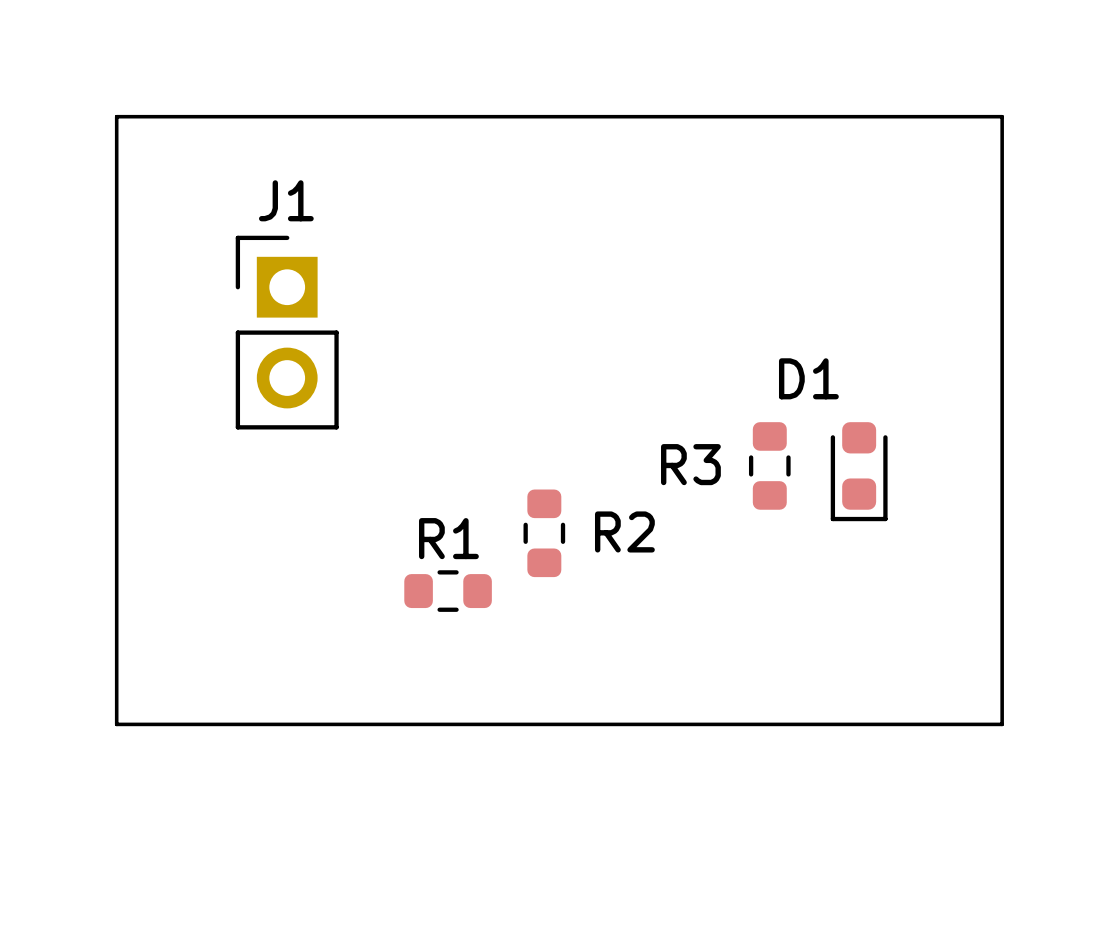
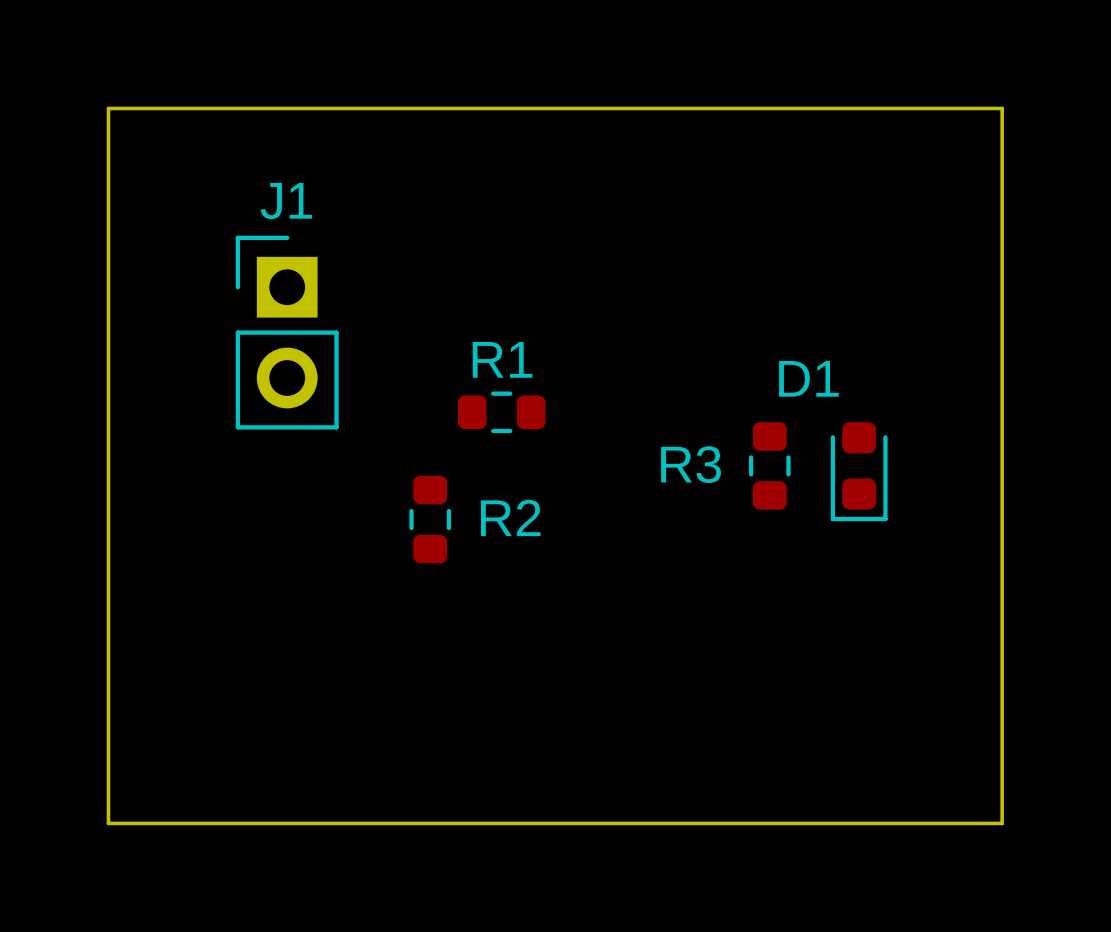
board edge: (1002, 116) (116, 116) (116, 724) (1002, 724) -> (1002, 116) (1002, 108) (108, 108) (108, 823) (1002, 823) (1002, 724)
R2 position: (544, 533) -> (430, 519)
R1 position: (448, 591) -> (501, 412)

